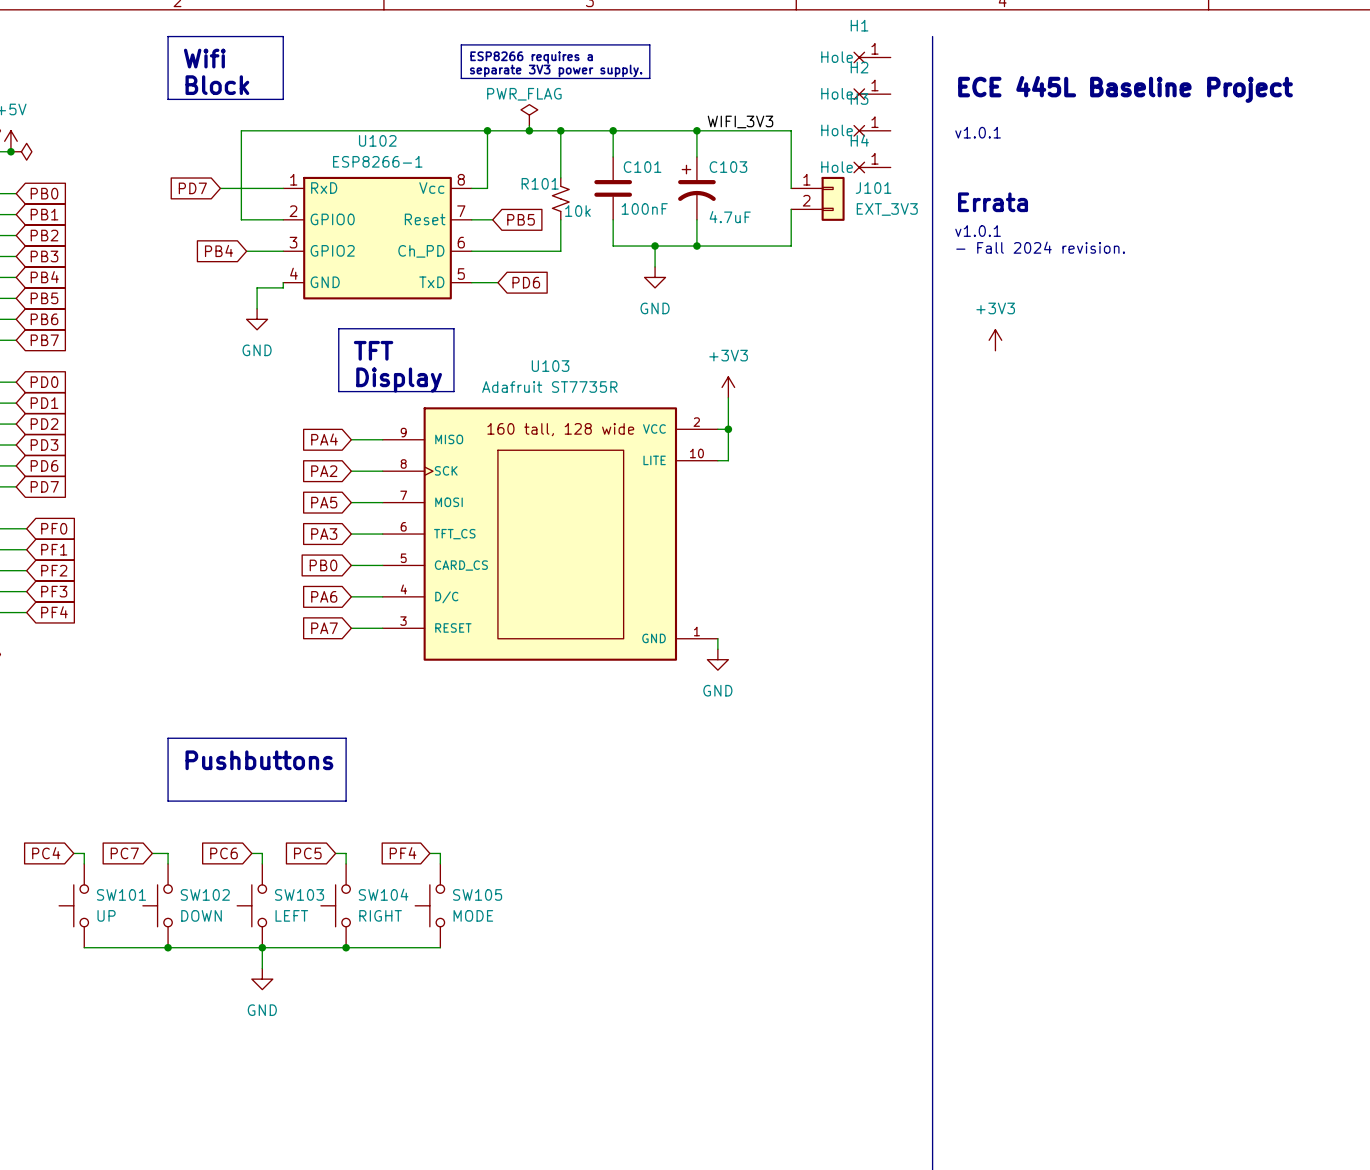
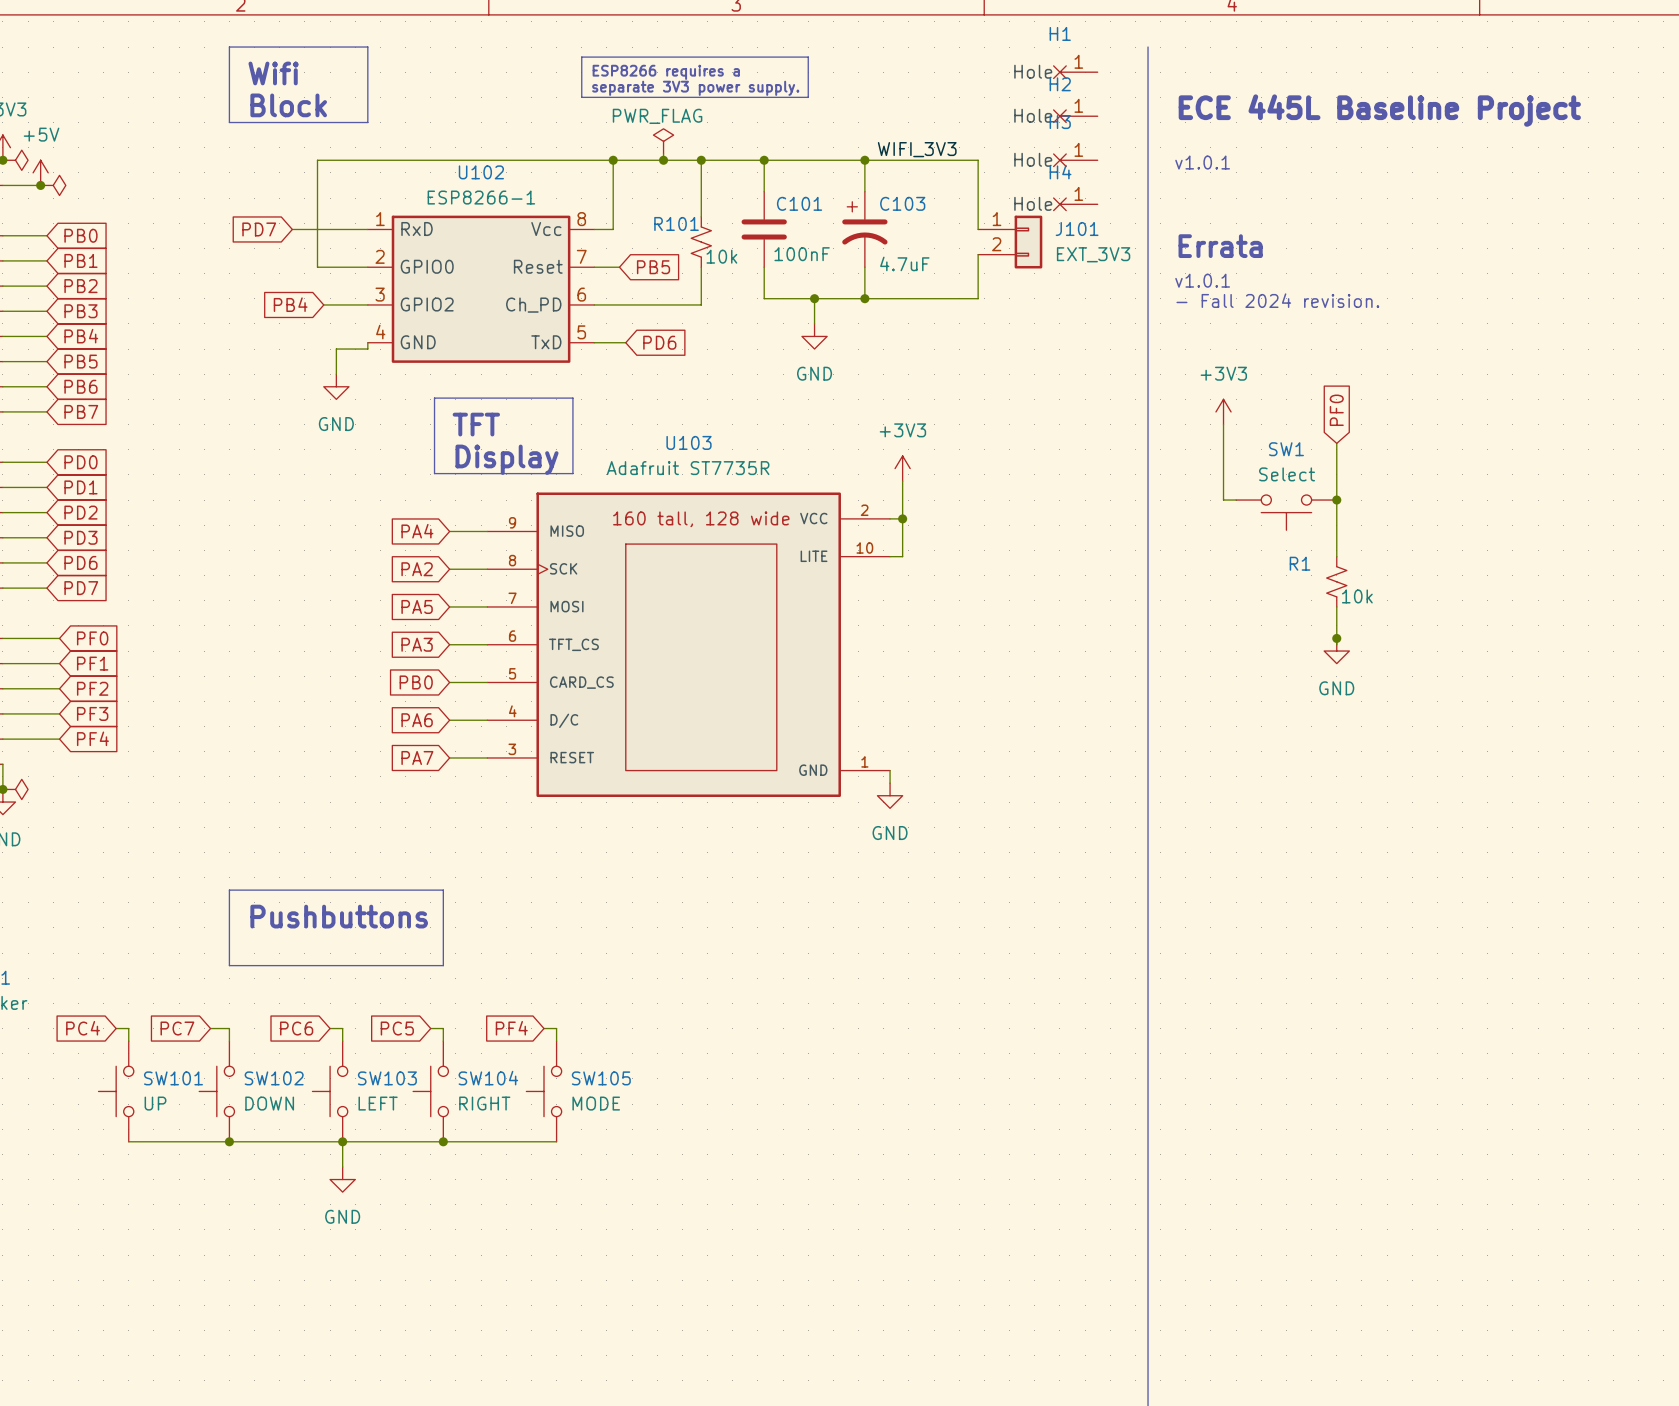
global label: none -> PF0 (1336, 410)
wire: none -> (1223, 424) (1223, 500) (1236, 500)
wire: none -> (1336, 443) (1336, 556)
junction: none -> (1336, 500)
SW1: none -> Select (1286, 512)
R1: none -> 10k (1336, 581)
wire: none -> (1336, 606) (1336, 644)
junction: none -> (1336, 638)
power symbol: none -> GND (1336, 651)

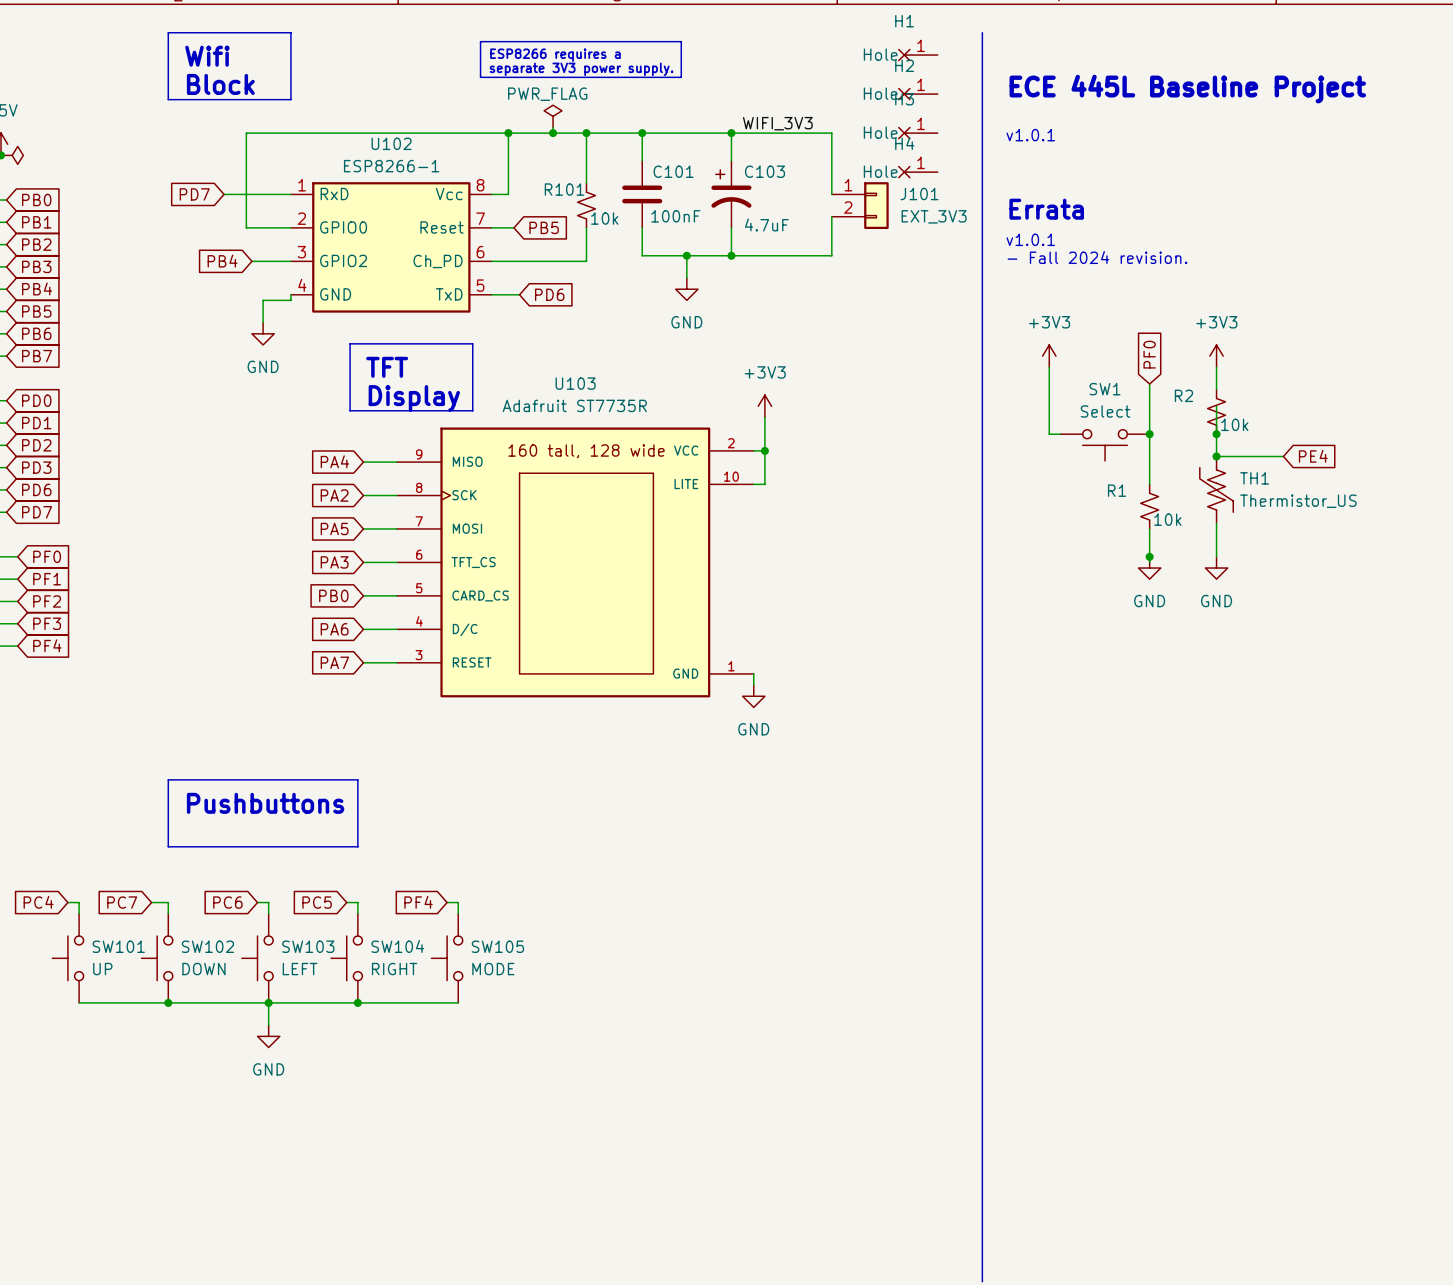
power symbol: none -> +3V3 (1216, 356)
wire: none -> (1216, 367) (1216, 389)
wire: none -> (1216, 406) (1216, 456) (1283, 456)
R2: none -> 10k (1216, 411)
junction: none -> (1216, 434)
global label: none -> PE4 (1313, 456)
junction: none -> (1216, 456)
TH1: none -> Thermistor_US (1216, 489)
wire: none -> (1216, 523) (1216, 556)
power symbol: none -> GND (1216, 568)

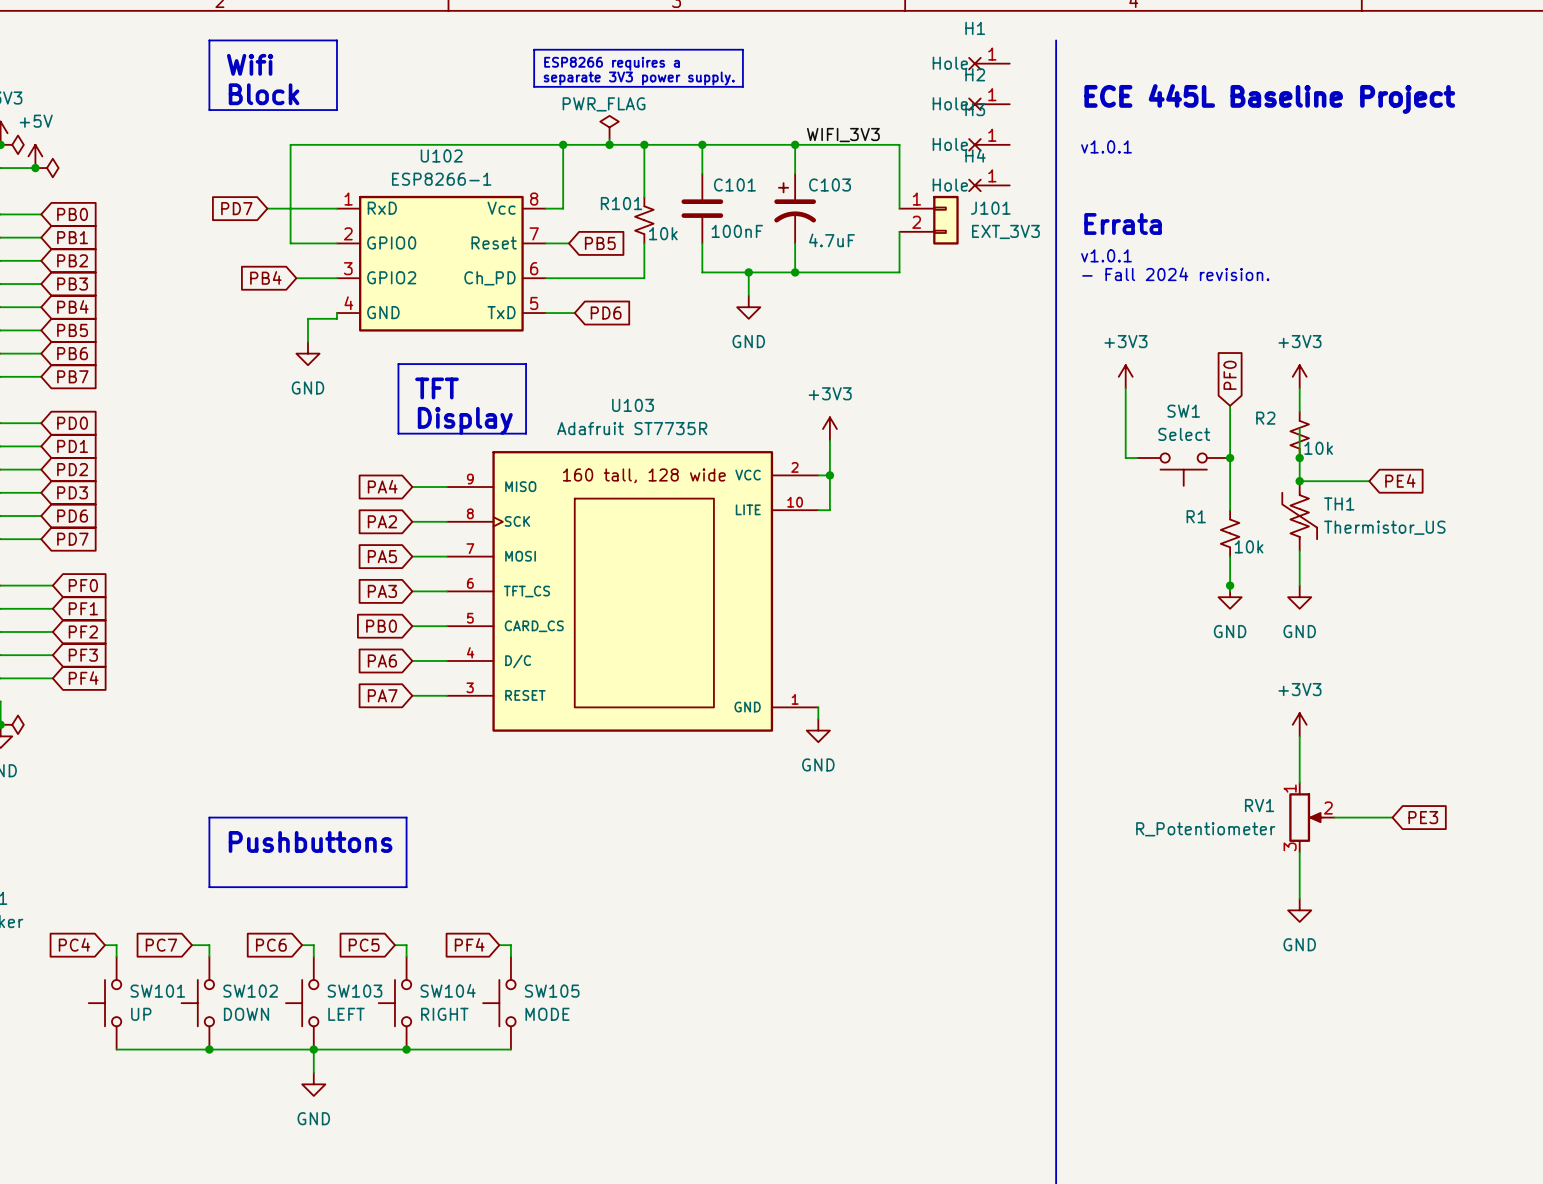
power symbol: none -> +3V3 (1299, 724)
wire: none -> (1299, 736) (1299, 782)
RV1: none -> R_Potentiometer (1311, 817)
wire: none -> (1334, 817) (1392, 817)
global label: none -> PE3 (1423, 817)
wire: none -> (1299, 852) (1299, 898)
power symbol: none -> GND (1299, 910)

